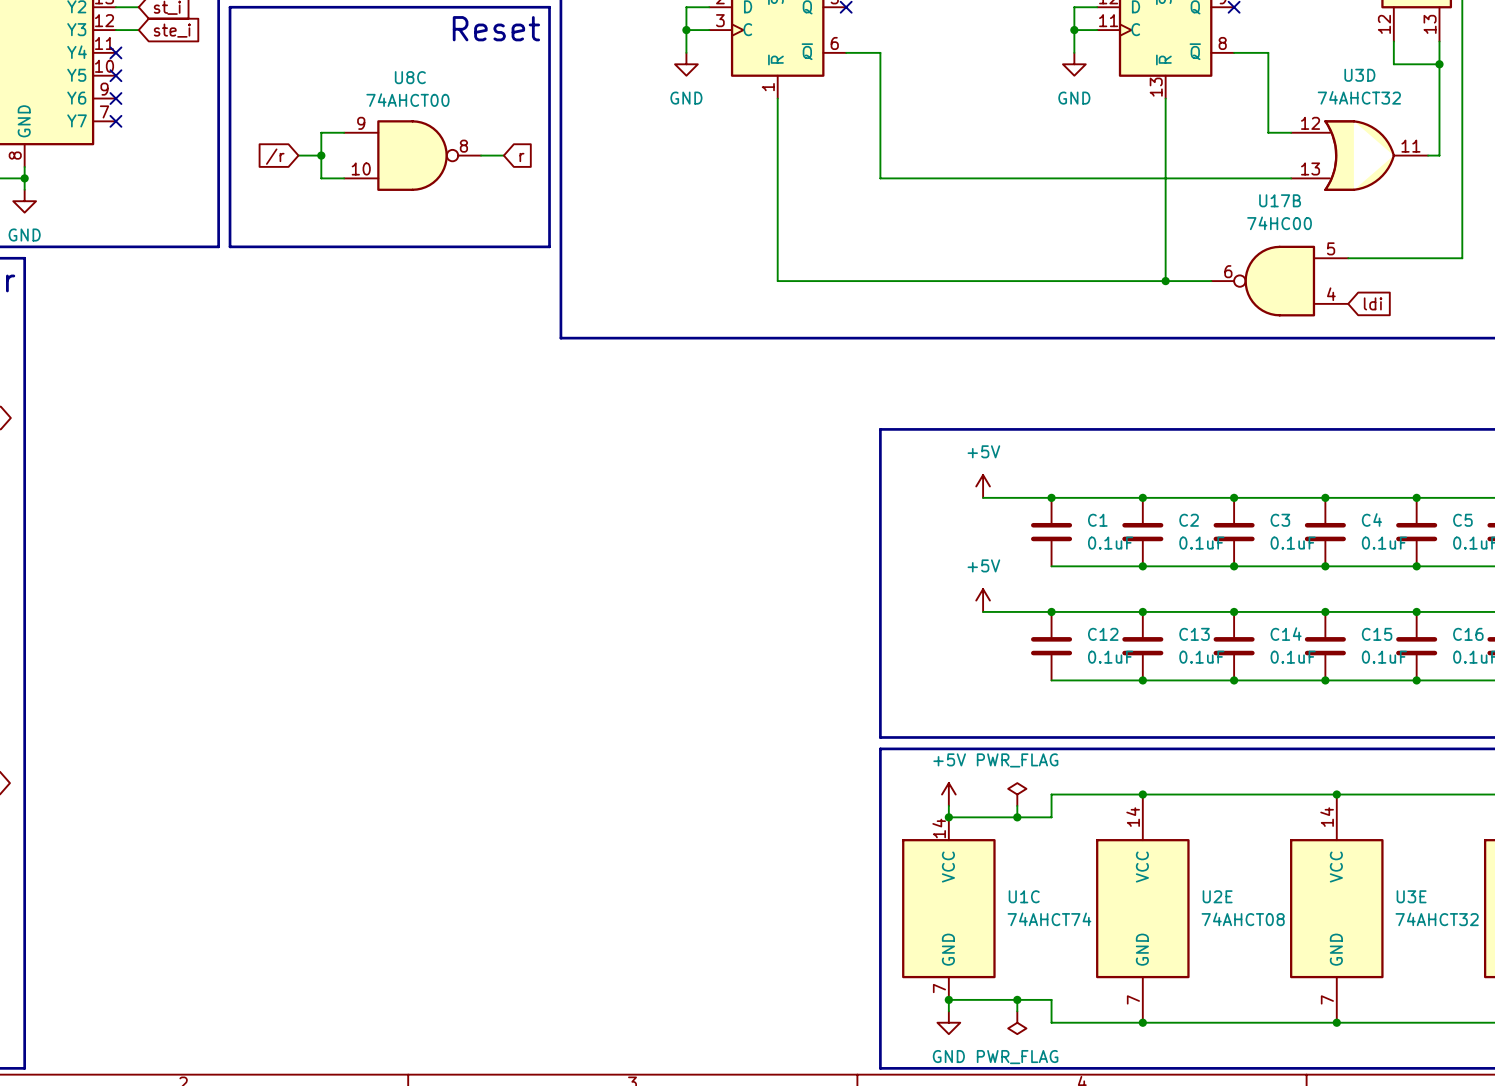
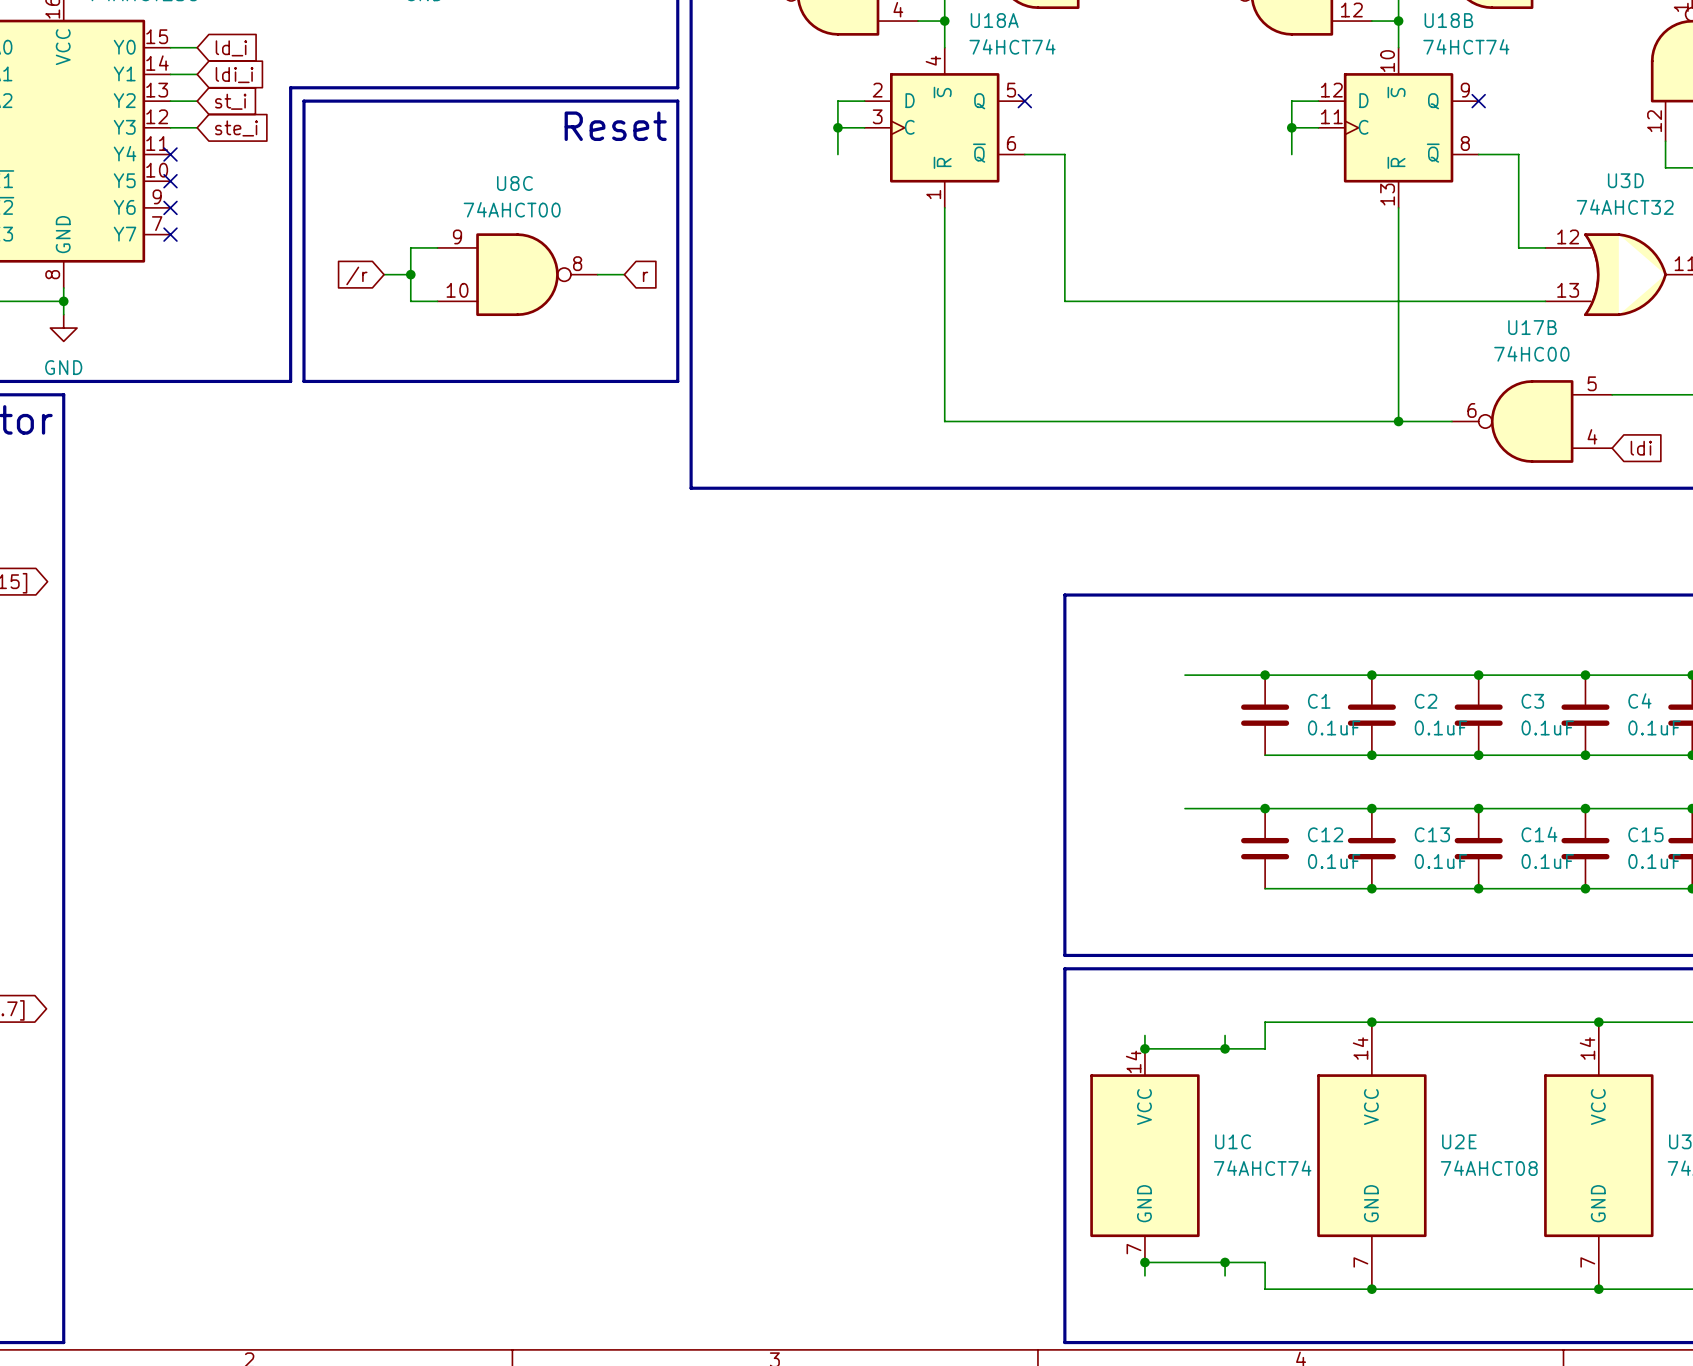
power symbol: GND (686, 64) -> none
power symbol: GND (1074, 64) -> none
power symbol: +5V (983, 486) -> none
power symbol: +5V (983, 600) -> none
power symbol: +5V (948, 794) -> none
power symbol: PWR_FLAG (1017, 794) -> none
power symbol: GND (948, 1022) -> none
power symbol: PWR_FLAG (1017, 1022) -> none

